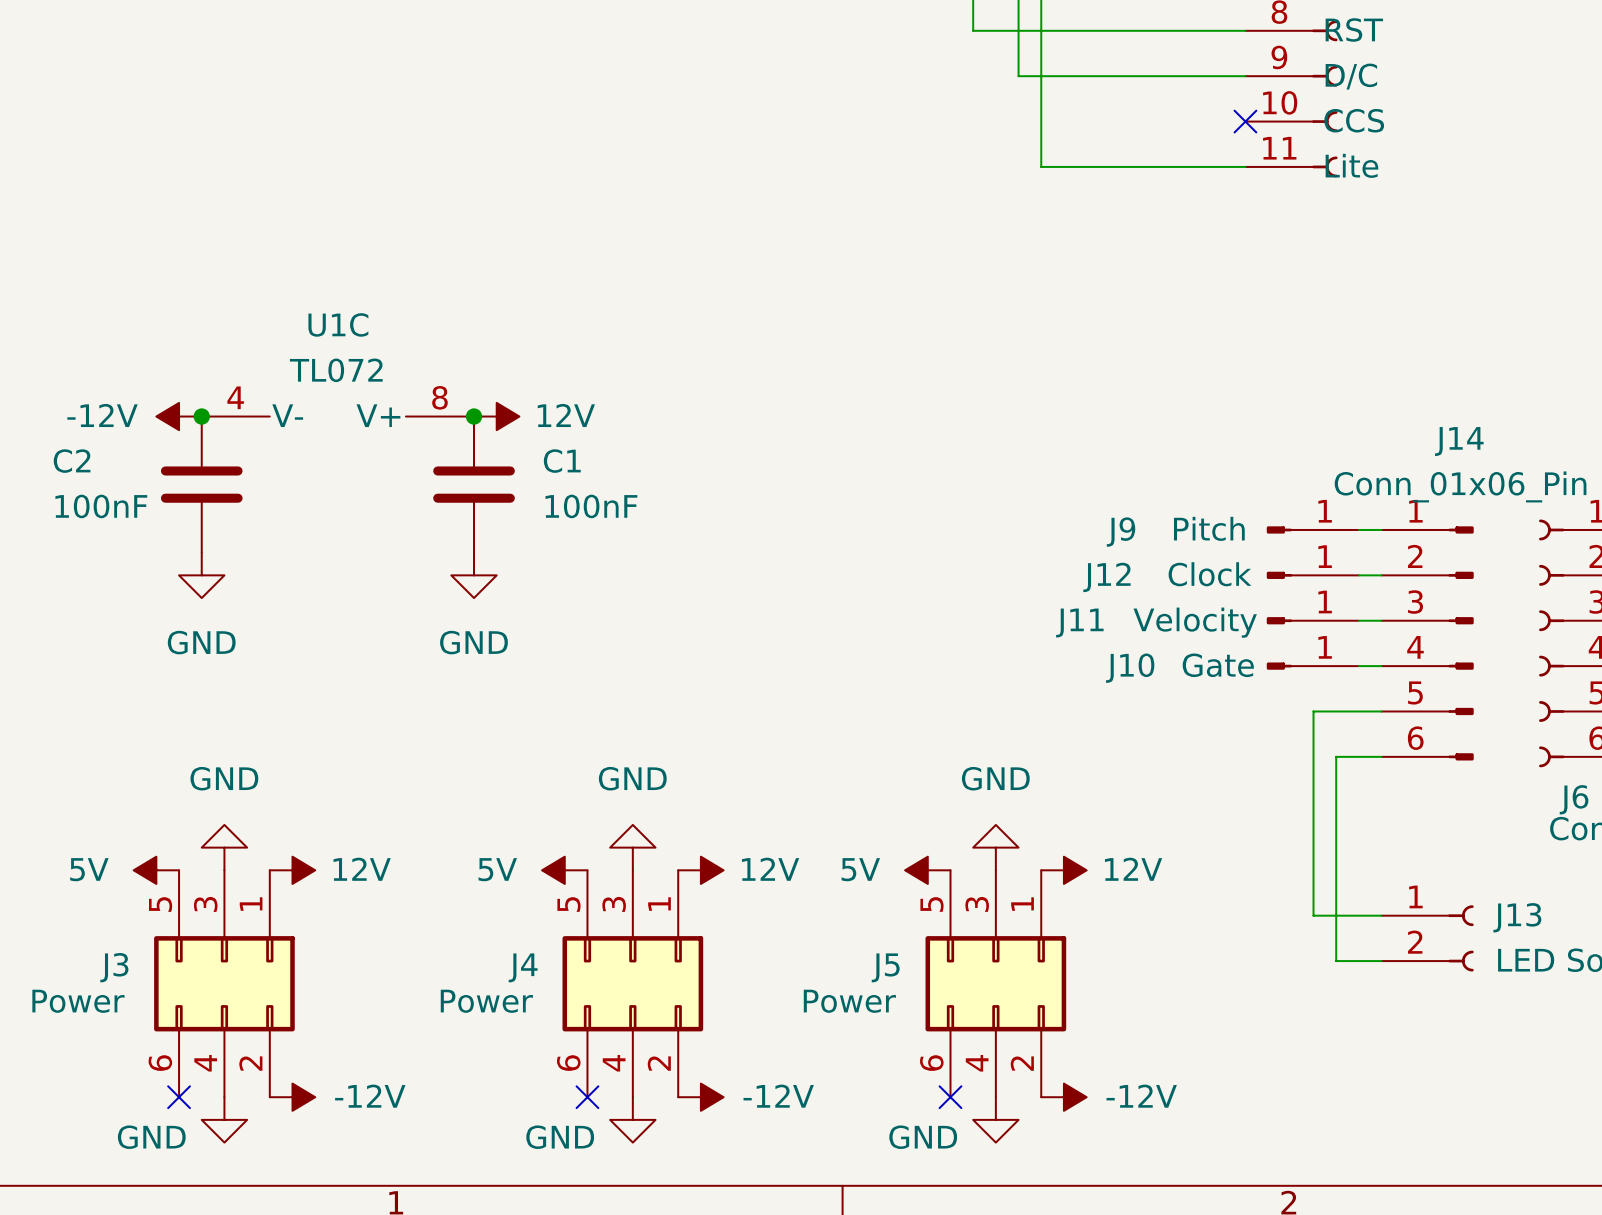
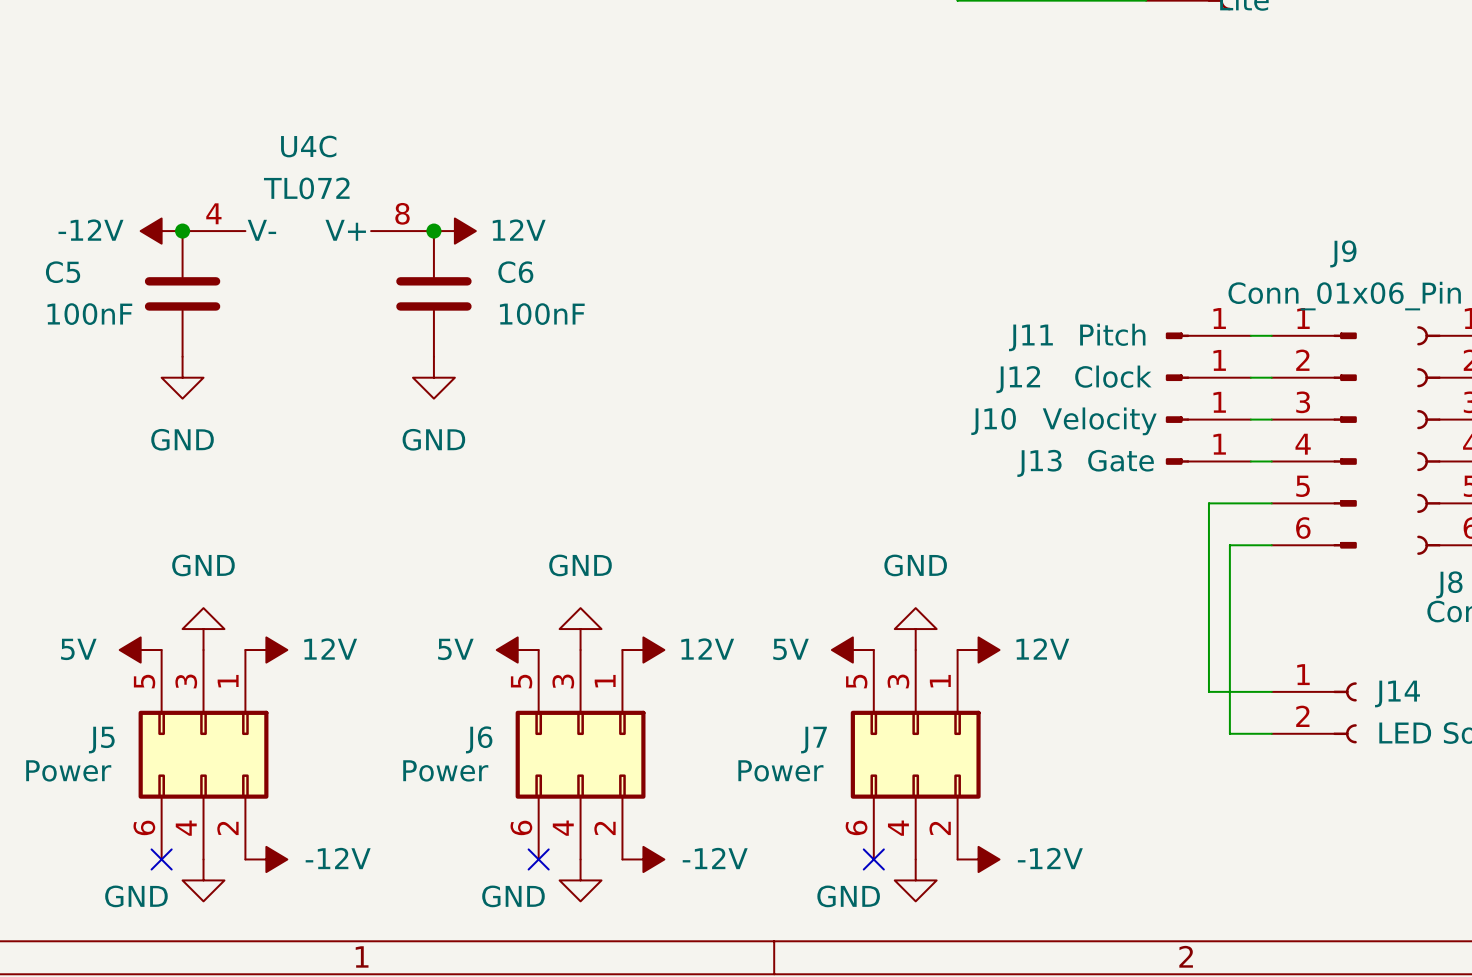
U1C name: U1C (338, 324) -> U4C (308, 146)
J14 name: J14 (1459, 441) -> J9 (1343, 253)
C2 name: C2 (72, 461) -> C5 (63, 272)
C1 name: C1 (562, 461) -> C6 (515, 272)
J9 name: J9 (1121, 532) -> J11 (1030, 337)
J11 name: J11 (1079, 623) -> J10 (993, 421)
J10 name: J10 (1130, 668) -> J13 (1039, 463)
J6 name: J6 (1574, 799) -> J8 (1449, 584)
J13 name: J13 (1517, 917) -> J14 (1397, 693)
J3 name: J3 (114, 967) -> J5 (101, 740)
J4 name: J4 (523, 967) -> J6 (479, 739)
J5 name: J5 (885, 967) -> J7 (814, 740)

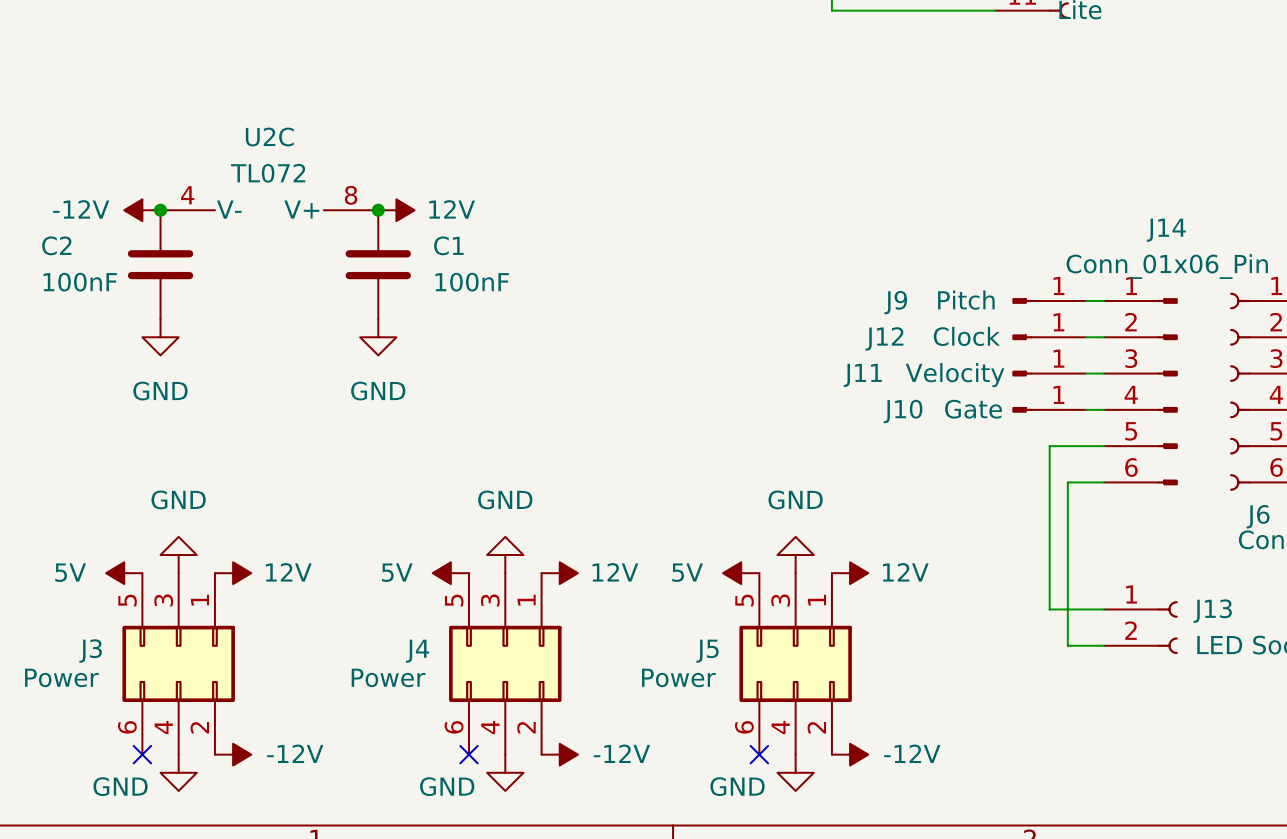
U4C name: U4C (308, 146) -> U2C (269, 137)
J9 name: J9 (1343, 253) -> J14 (1166, 230)
C5 name: C5 (63, 272) -> C2 (56, 245)
C6 name: C6 (515, 272) -> C1 (448, 245)
J11 name: J11 (1030, 337) -> J9 (895, 302)
J10 name: J10 (993, 421) -> J11 (862, 375)
J13 name: J13 (1039, 463) -> J10 (903, 411)
J8 name: J8 (1449, 584) -> J6 (1258, 516)
J14 name: J14 (1397, 693) -> J13 (1212, 611)
J6 name: J6 (479, 739) -> J4 (417, 651)
J5 name: J5 (101, 740) -> J3 (90, 651)
J7 name: J7 (814, 740) -> J5 (707, 651)

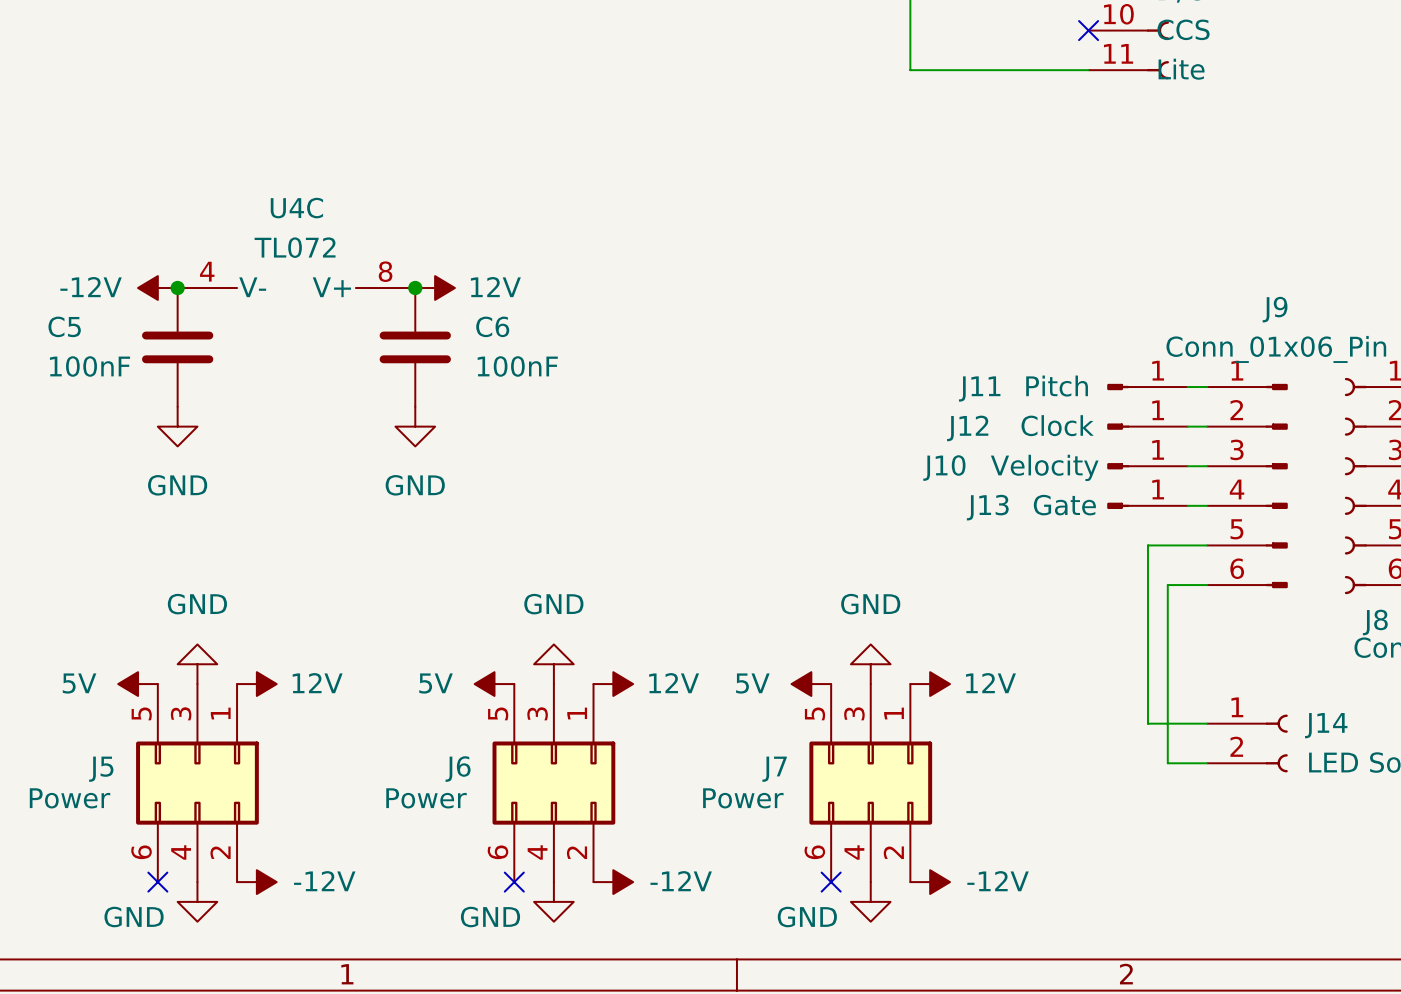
U2C name: U2C (269, 137) -> U4C (296, 208)
J14 name: J14 (1166, 230) -> J9 (1275, 309)
C2 name: C2 (56, 245) -> C5 (64, 326)
C1 name: C1 (448, 245) -> C6 (492, 326)
J9 name: J9 (895, 302) -> J11 (979, 388)
J11 name: J11 (862, 375) -> J10 (944, 468)
J10 name: J10 (903, 411) -> J13 (987, 507)
J6 name: J6 (1258, 516) -> J8 (1375, 622)
J13 name: J13 (1212, 611) -> J14 (1326, 725)
J3 name: J3 (90, 651) -> J5 (101, 769)
J4 name: J4 (417, 651) -> J6 (458, 769)
J5 name: J5 (707, 651) -> J7 (774, 769)

